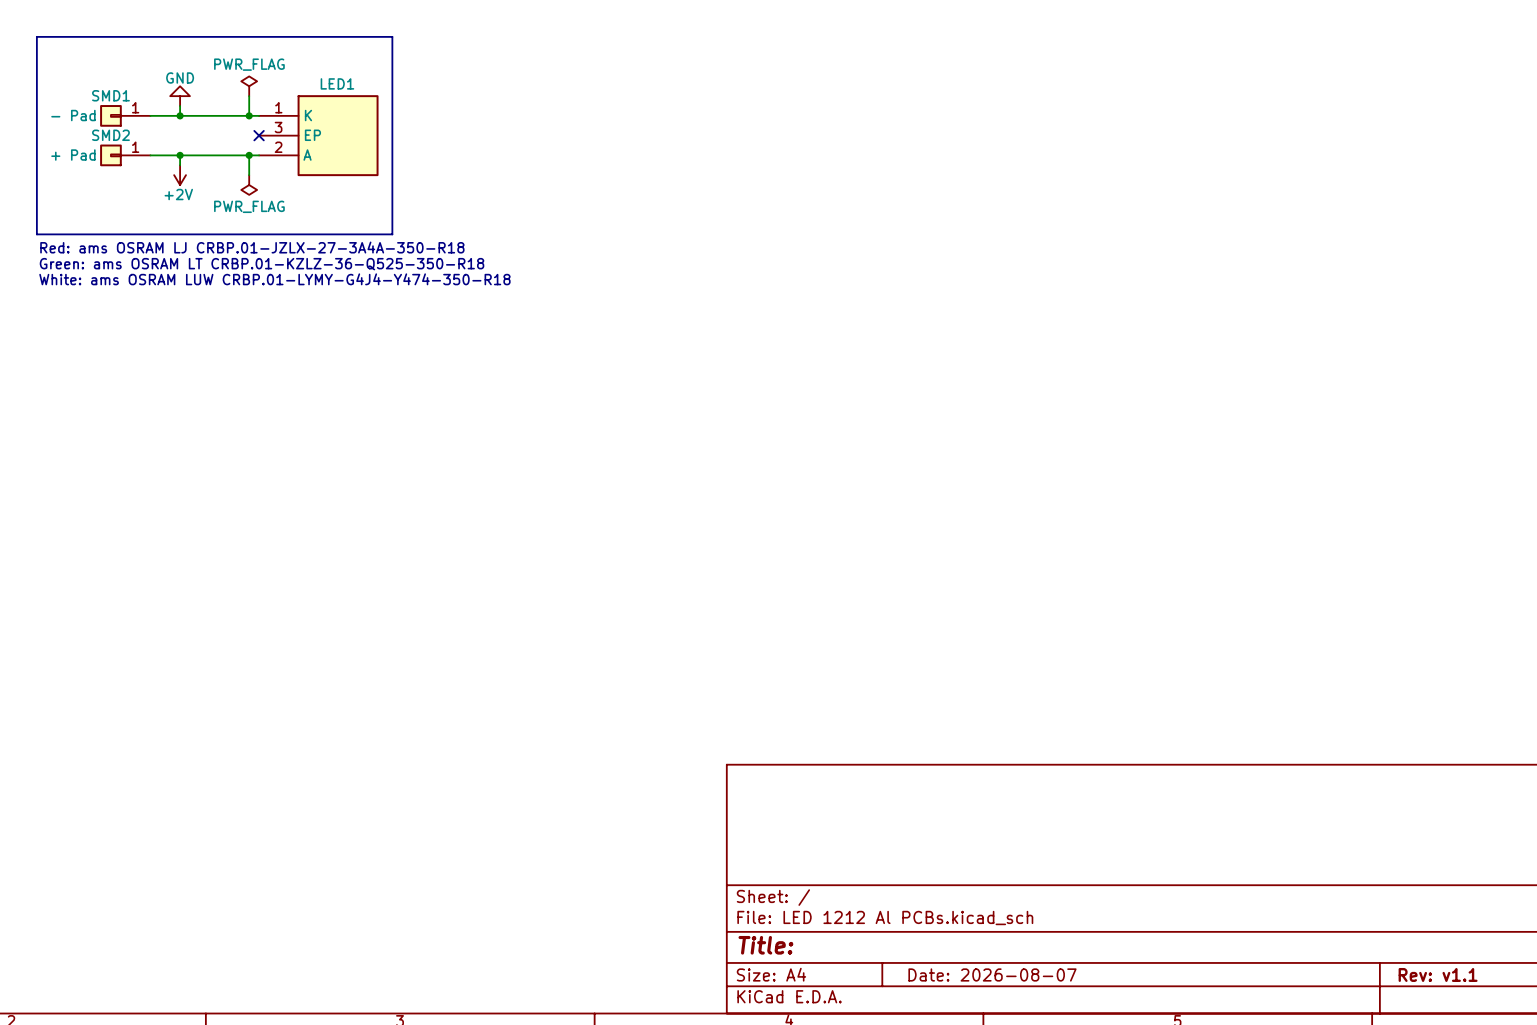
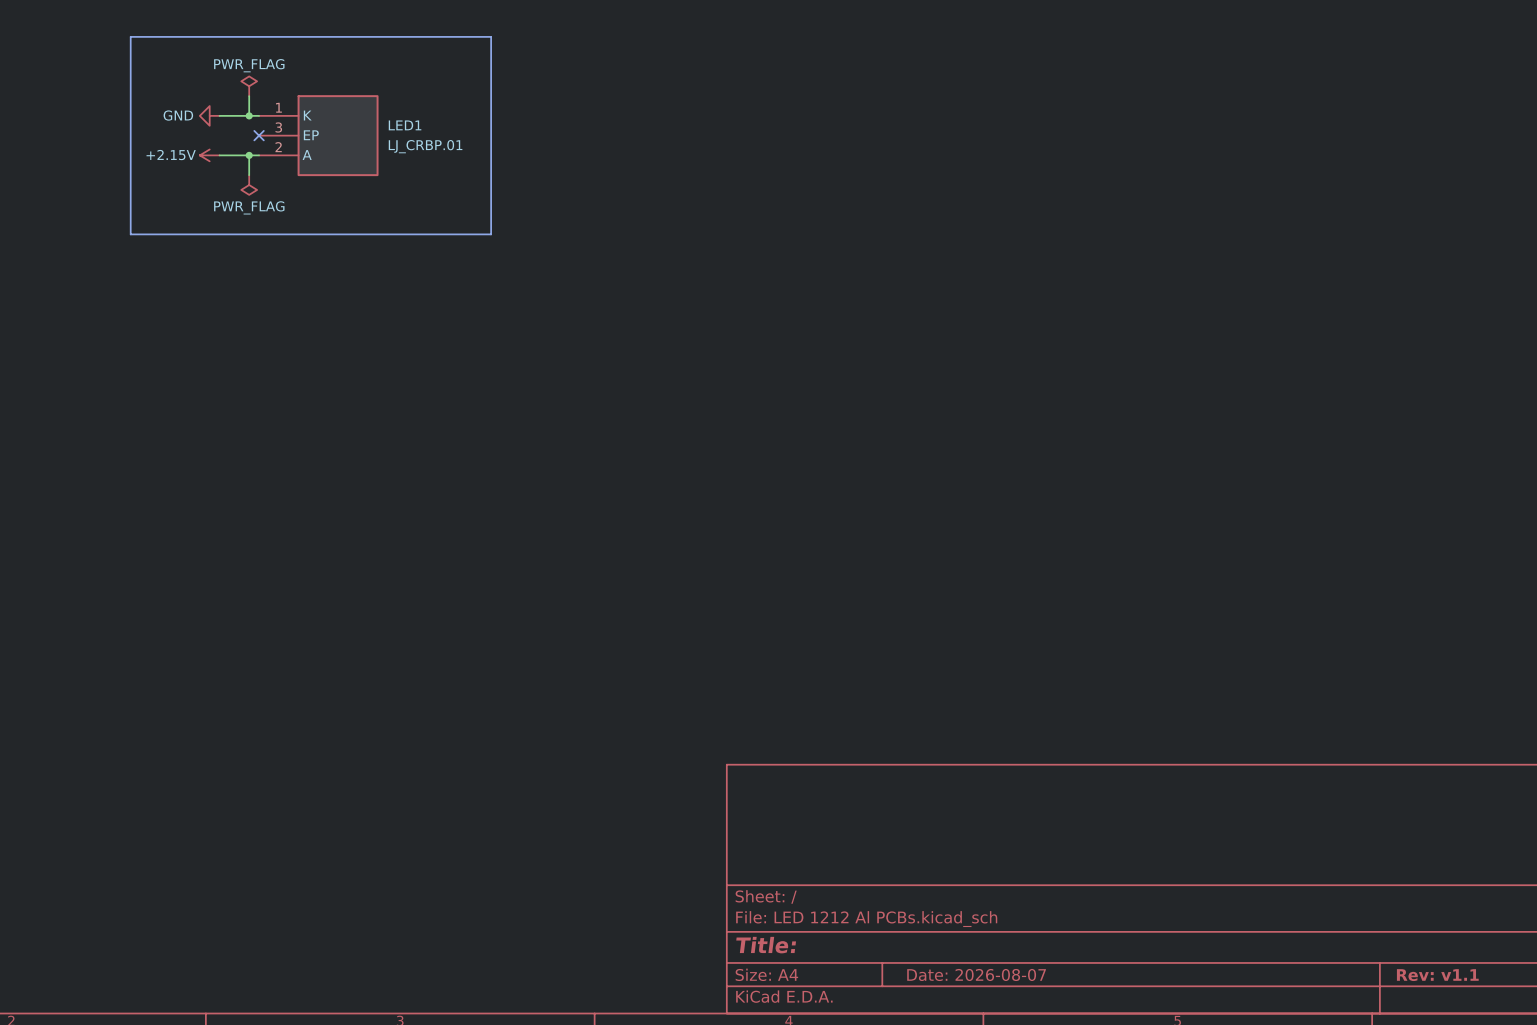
line: (130, 36) (36, 36) (36, 234) (130, 234) -> (130, 36) (130, 234)
line: (392, 36) (392, 234) -> (392, 36) (491, 36) (491, 234) (392, 234)
power symbol text position: GND (180, 78) -> GND (178, 115)
LED1 name position: LED1 (337, 83) -> LED1 (405, 125)
power symbol rotation: 0° (180, 96) -> 90° counterclockwise (209, 115)
power symbol position: GND (180, 96) -> GND (209, 115)
wire: (180, 106) (180, 115) -> none
SMD1: - Pad (125, 115) -> none
wire: (150, 115) (219, 115) -> none
junction: (180, 115) -> none
LED1 value: none -> LJ_CRBP.01 (425, 146)
SMD2: + Pad (125, 155) -> none
wire: (150, 155) (219, 155) -> none
wire: (180, 155) (180, 165) -> none
junction: (180, 155) -> none
power symbol: none -> +2.15V (209, 155)
power symbol: +2V (180, 175) -> none
text: Red: ams OSRAM LJ CRBP.01-JZLX-27-3A4A-350-R18 (252, 247) -> none
text: Green: ams OSRAM LT CRBP.01-KZLZ-36-Q525-350-R18 (262, 264) -> none
text: White: ams OSRAM LUW CRBP.01-LYMY-G4J4-Y474-350-R18 (274, 279) -> none

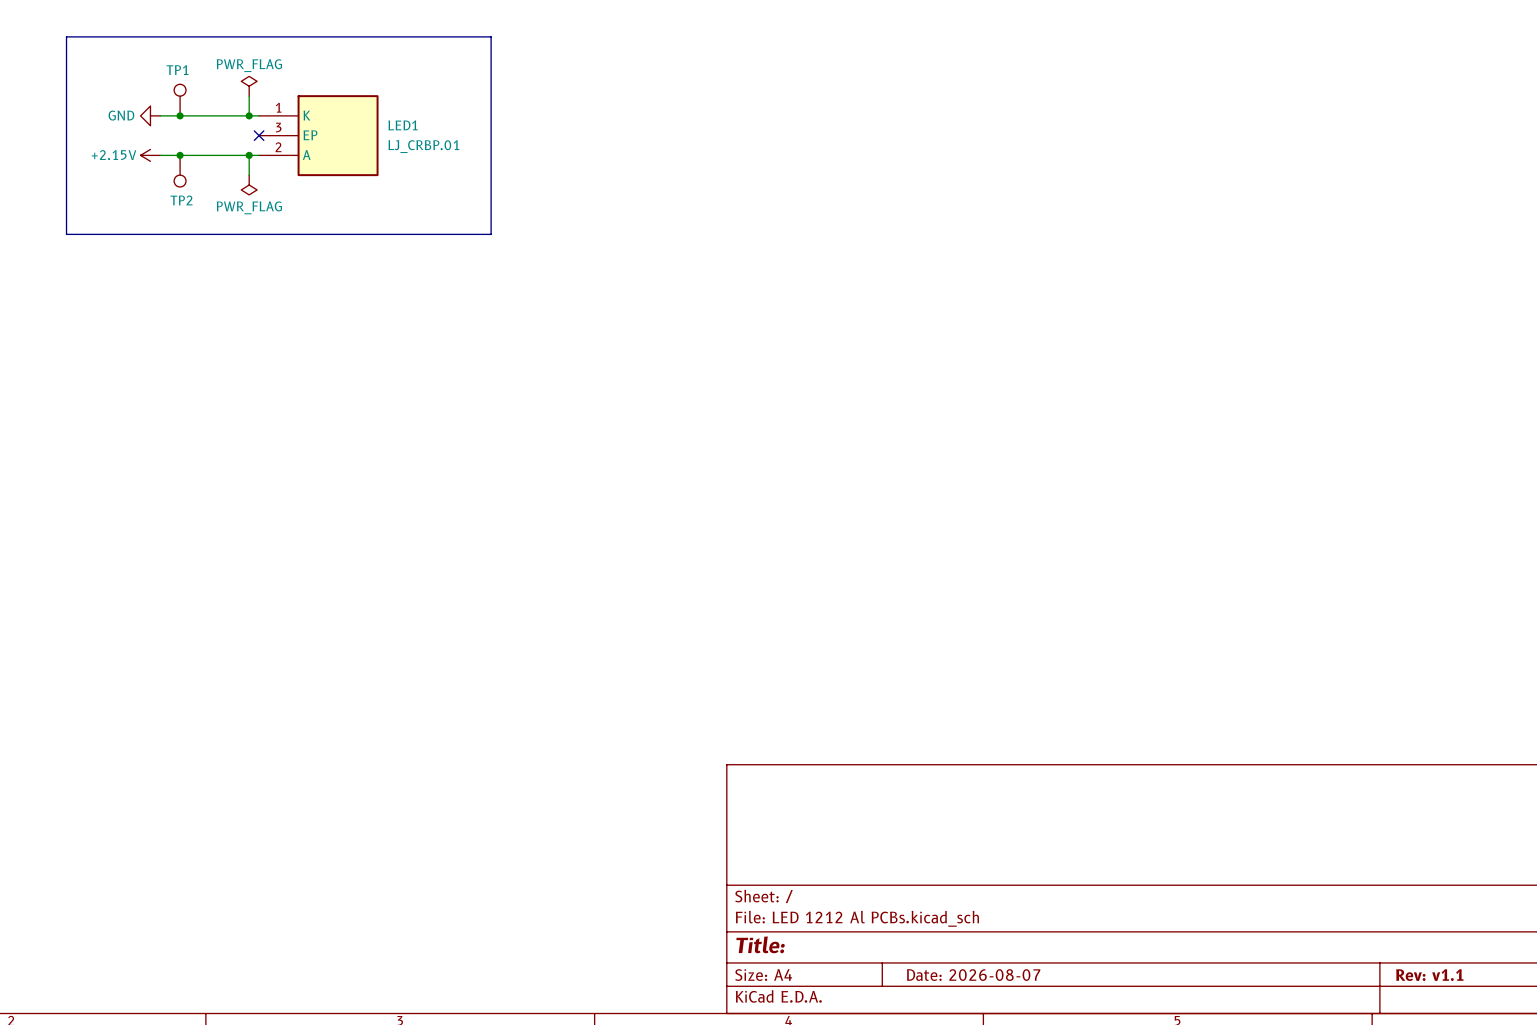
line: (130, 36) (130, 234) -> (130, 36) (66, 36) (66, 234) (130, 234)
TP1: none -> (180, 100)
wire: none -> (160, 115) (219, 115)
junction: none -> (180, 115)
power symbol position: GND (209, 115) -> GND (150, 115)
wire: none -> (160, 155) (219, 155)
junction: none -> (180, 155)
power symbol position: +2.15V (209, 155) -> +2.15V (150, 155)
TP2: none -> (180, 171)

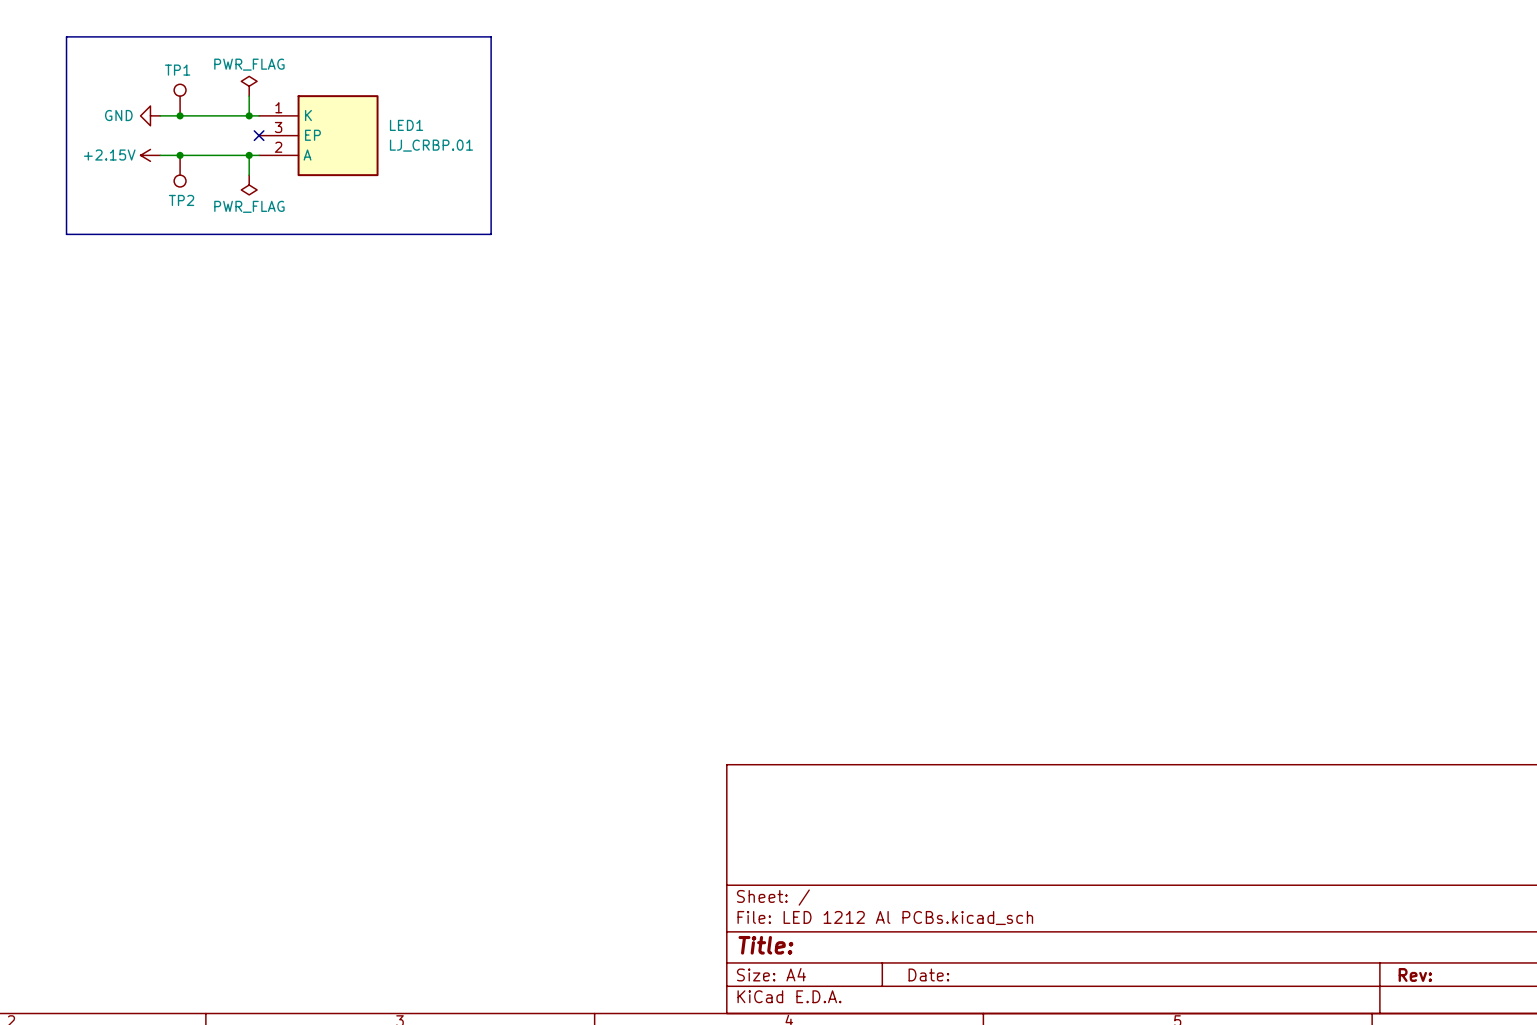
title block: Date: 2026-08-07 (973, 975) -> Date: (928, 974)
title block: Rev: v1.1 (1429, 975) -> Rev: (1415, 974)

